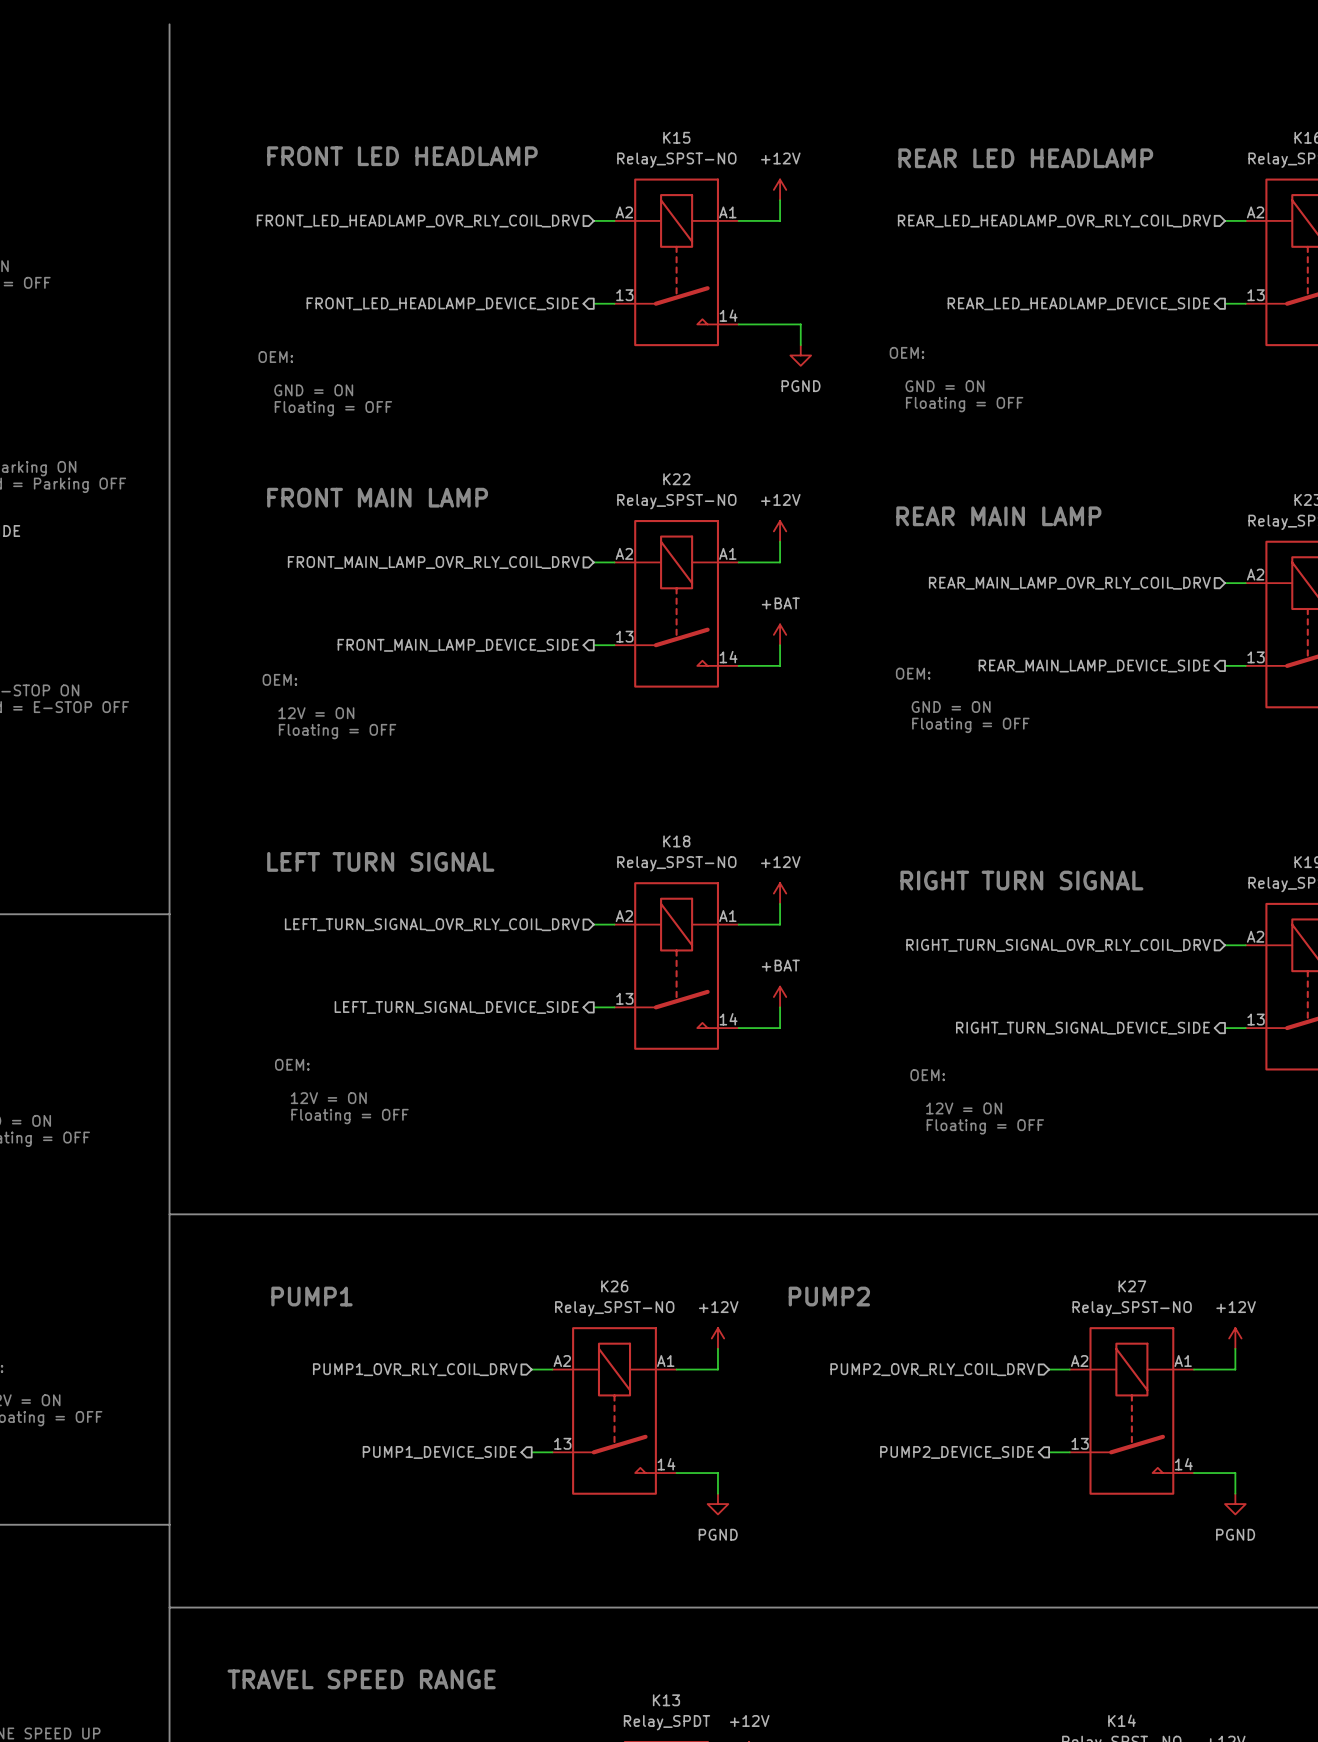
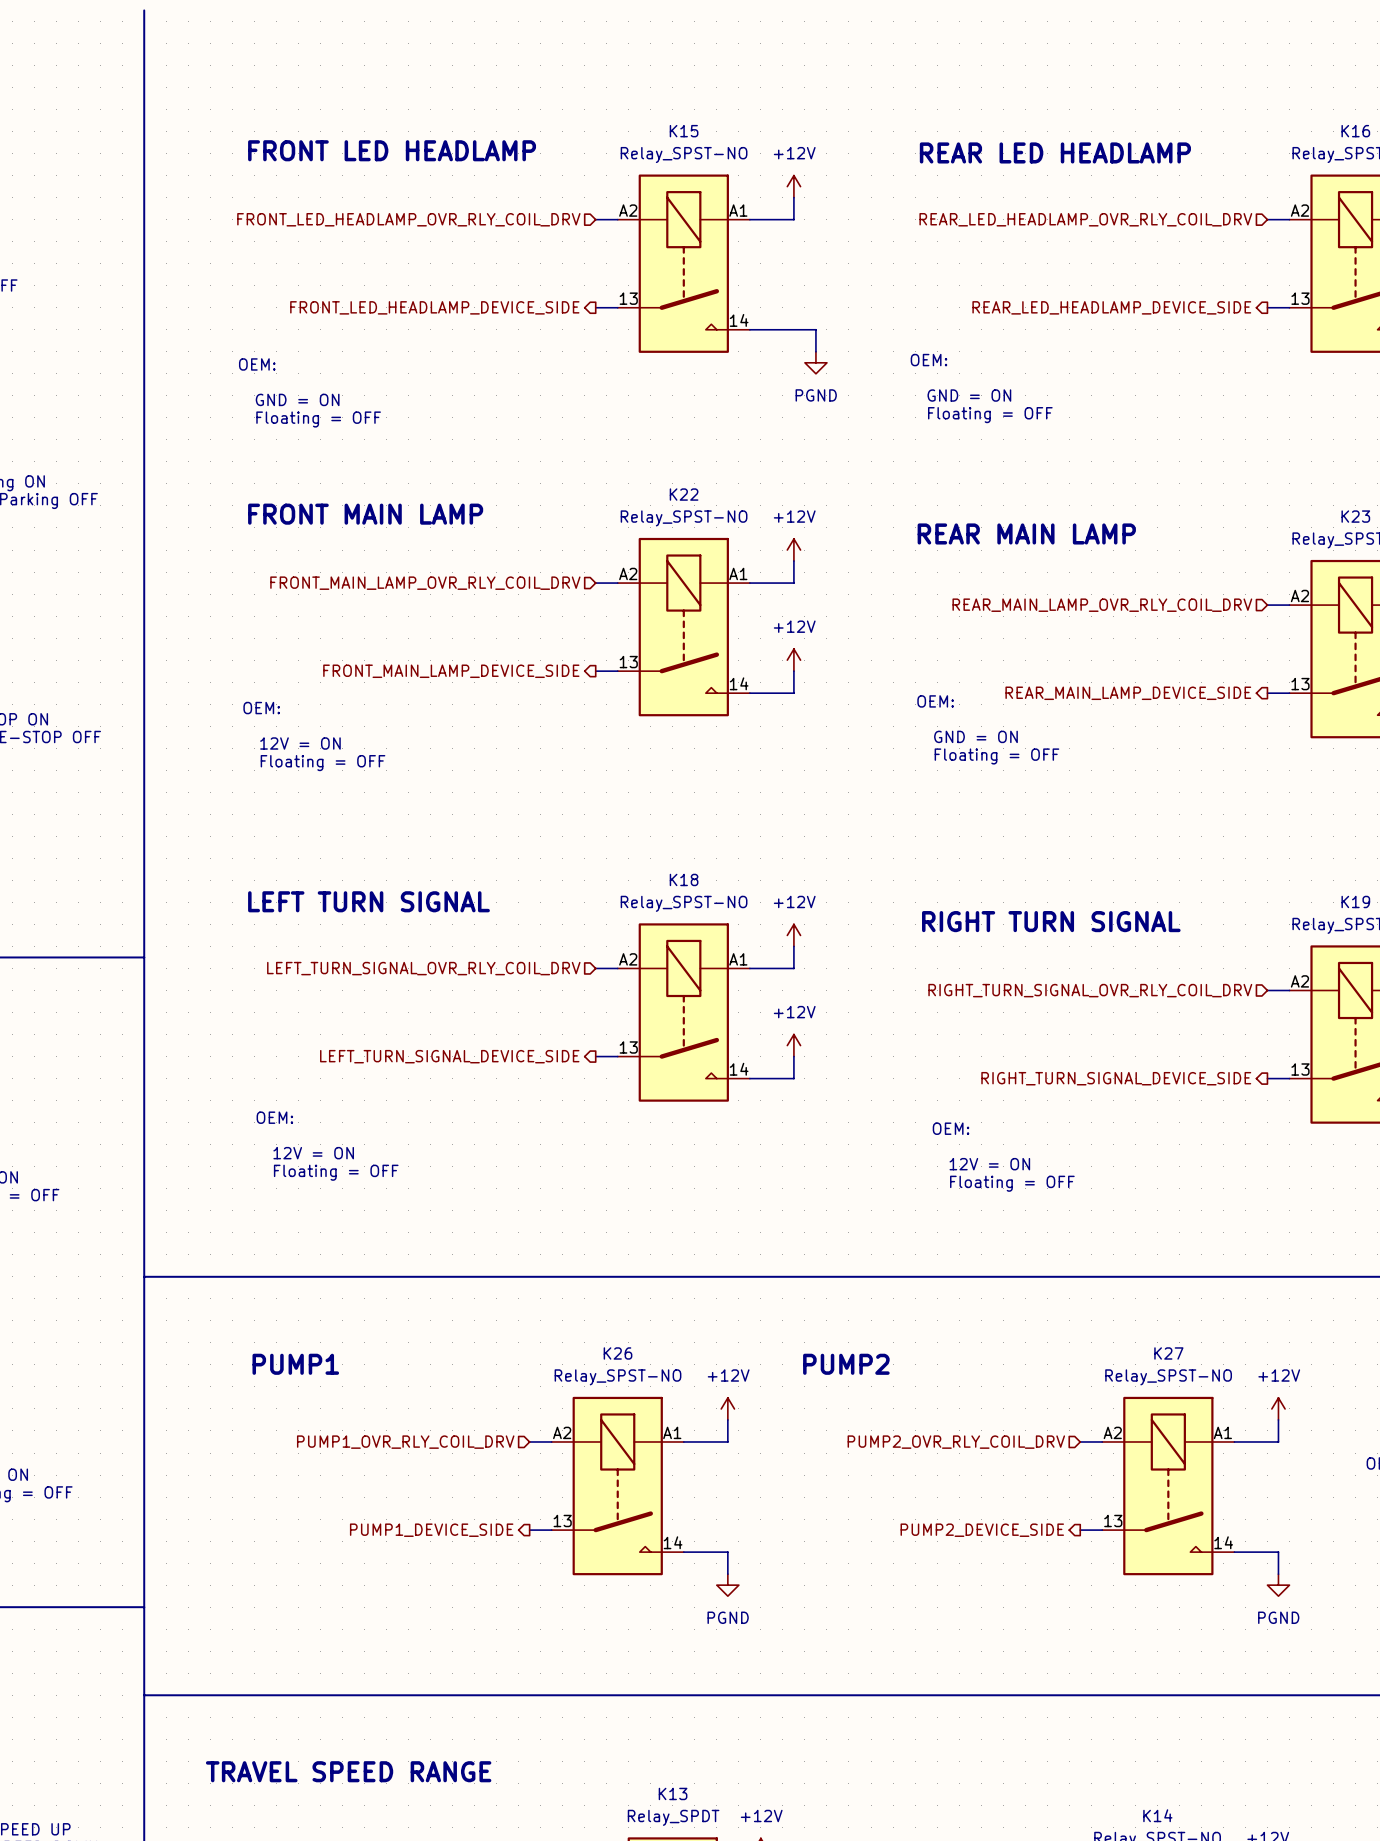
power symbol: +BAT (780, 634) -> +12V (793, 660)
power symbol: +BAT (780, 997) -> +12V (793, 1045)

